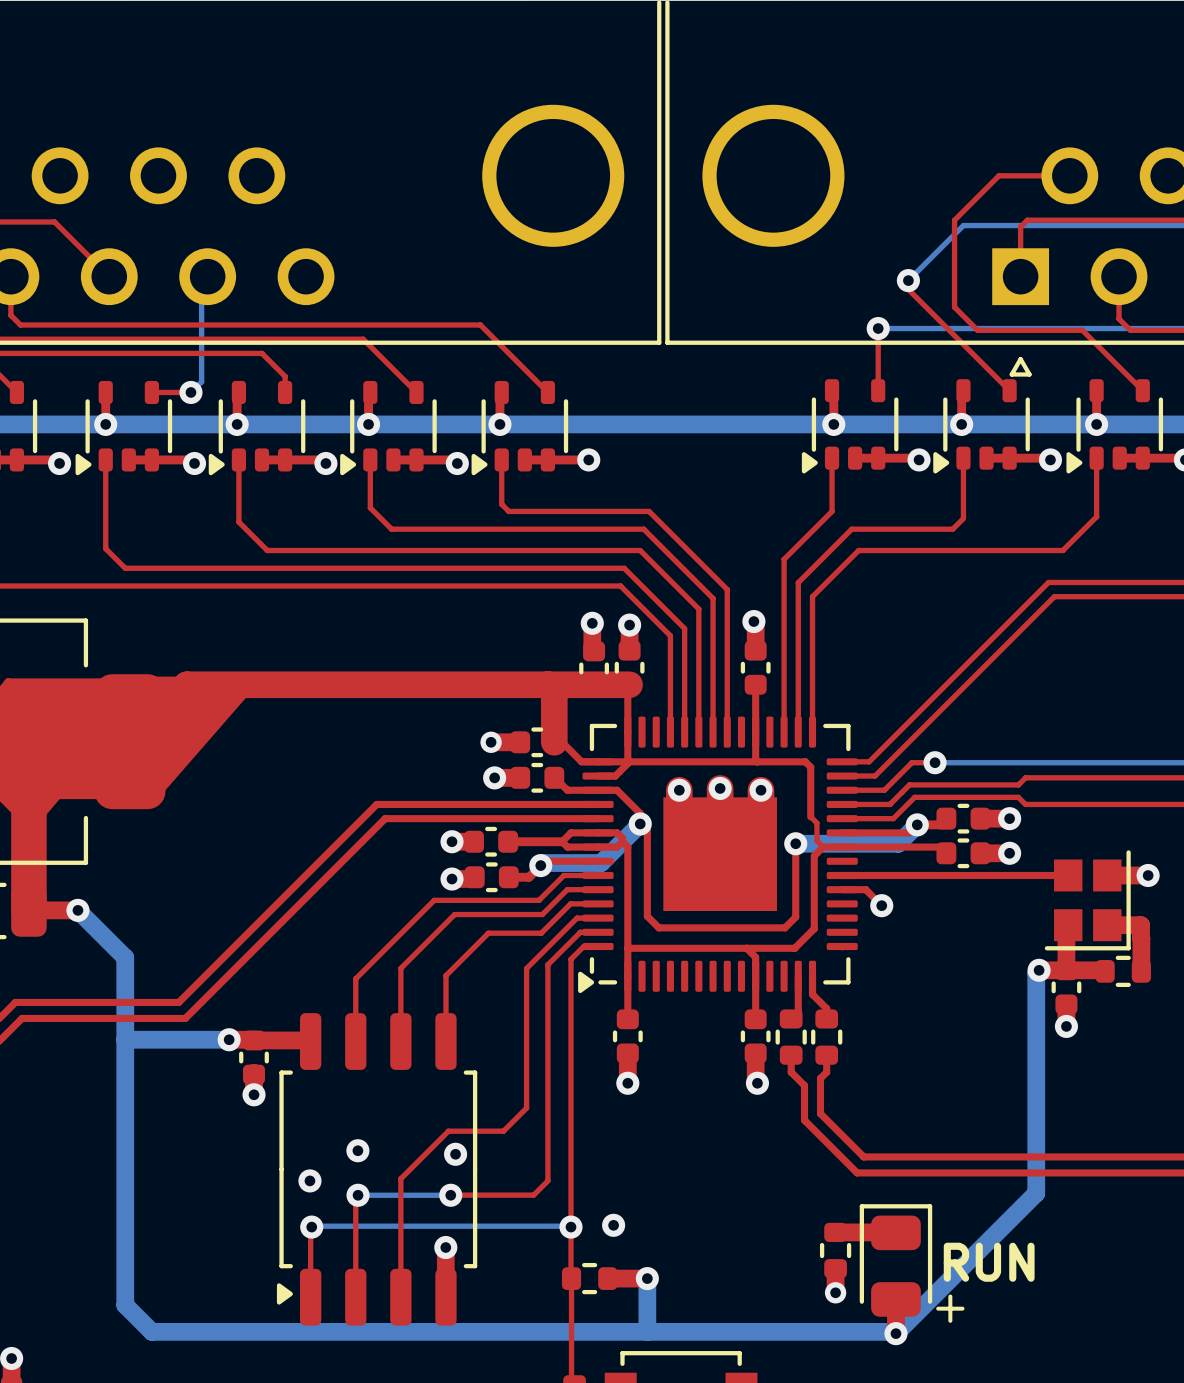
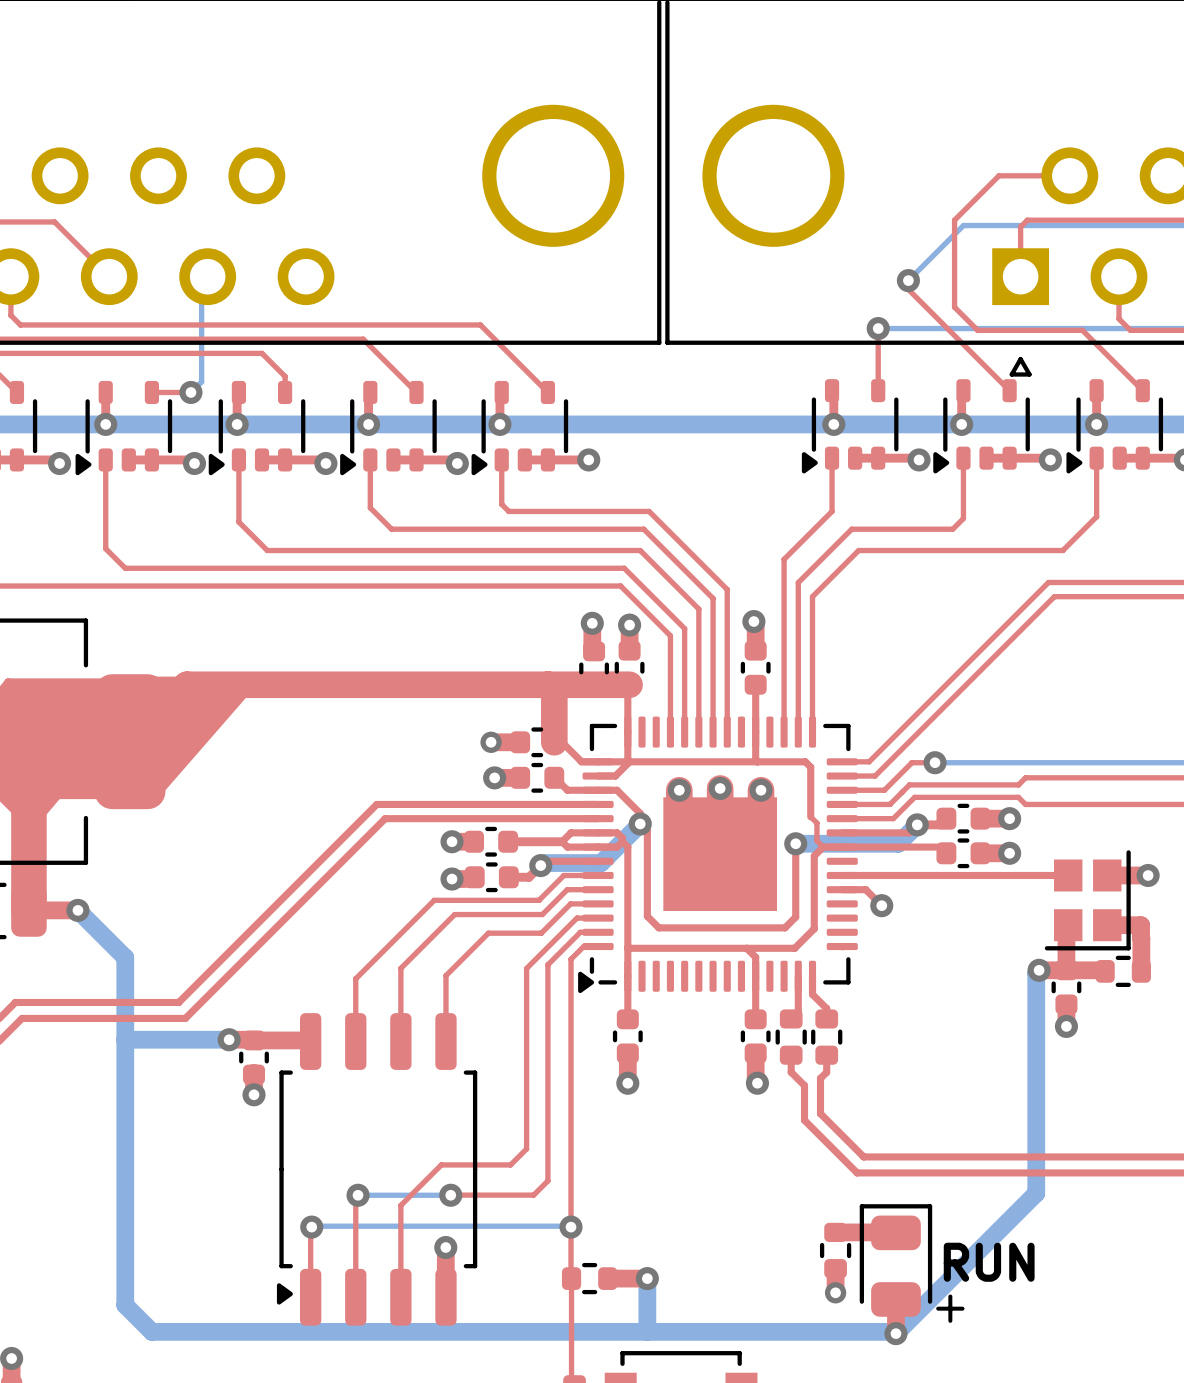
top track: (526, 1108) (503, 1131) (448, 1131) (400, 1178) (400, 1205) -> (526, 1108) (526, 1148) (510, 1164) (441, 1164) (400, 1205)
via: (357, 1150) -> none
via: (455, 1154) -> none
via: (309, 1180) -> none
via: (613, 1225) -> none

